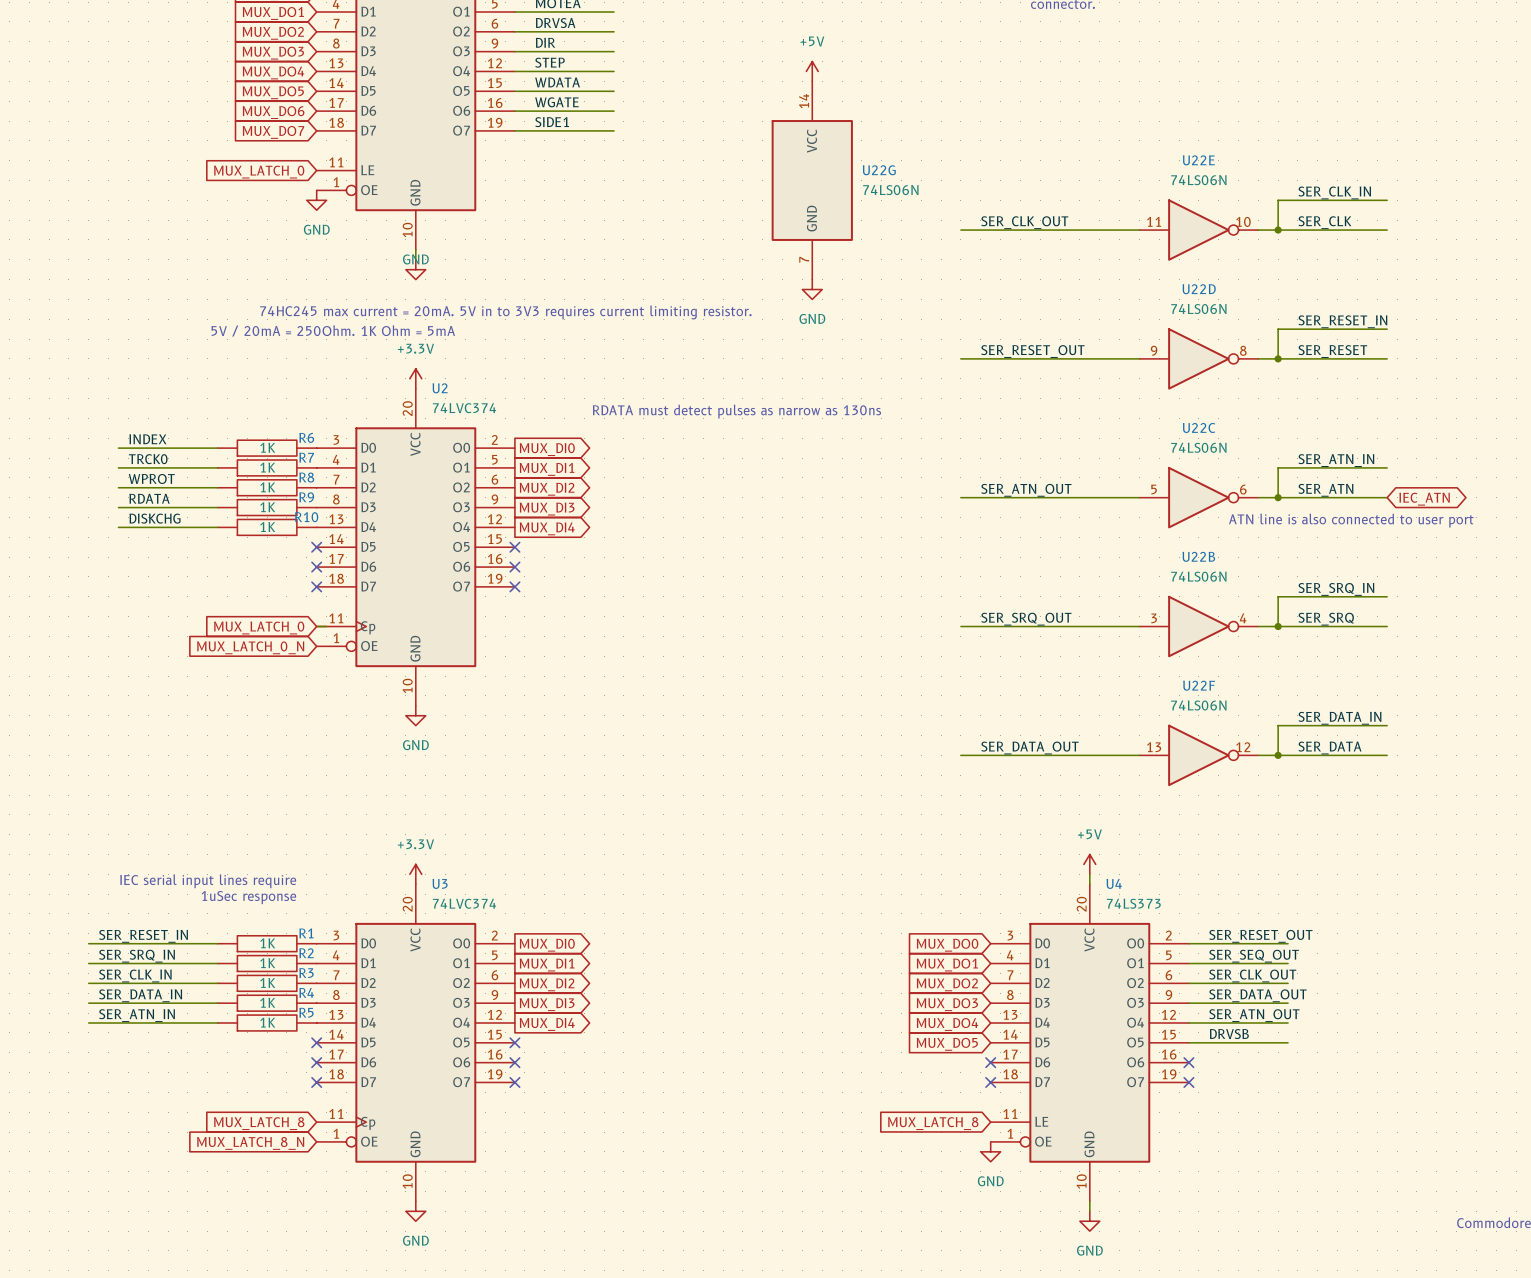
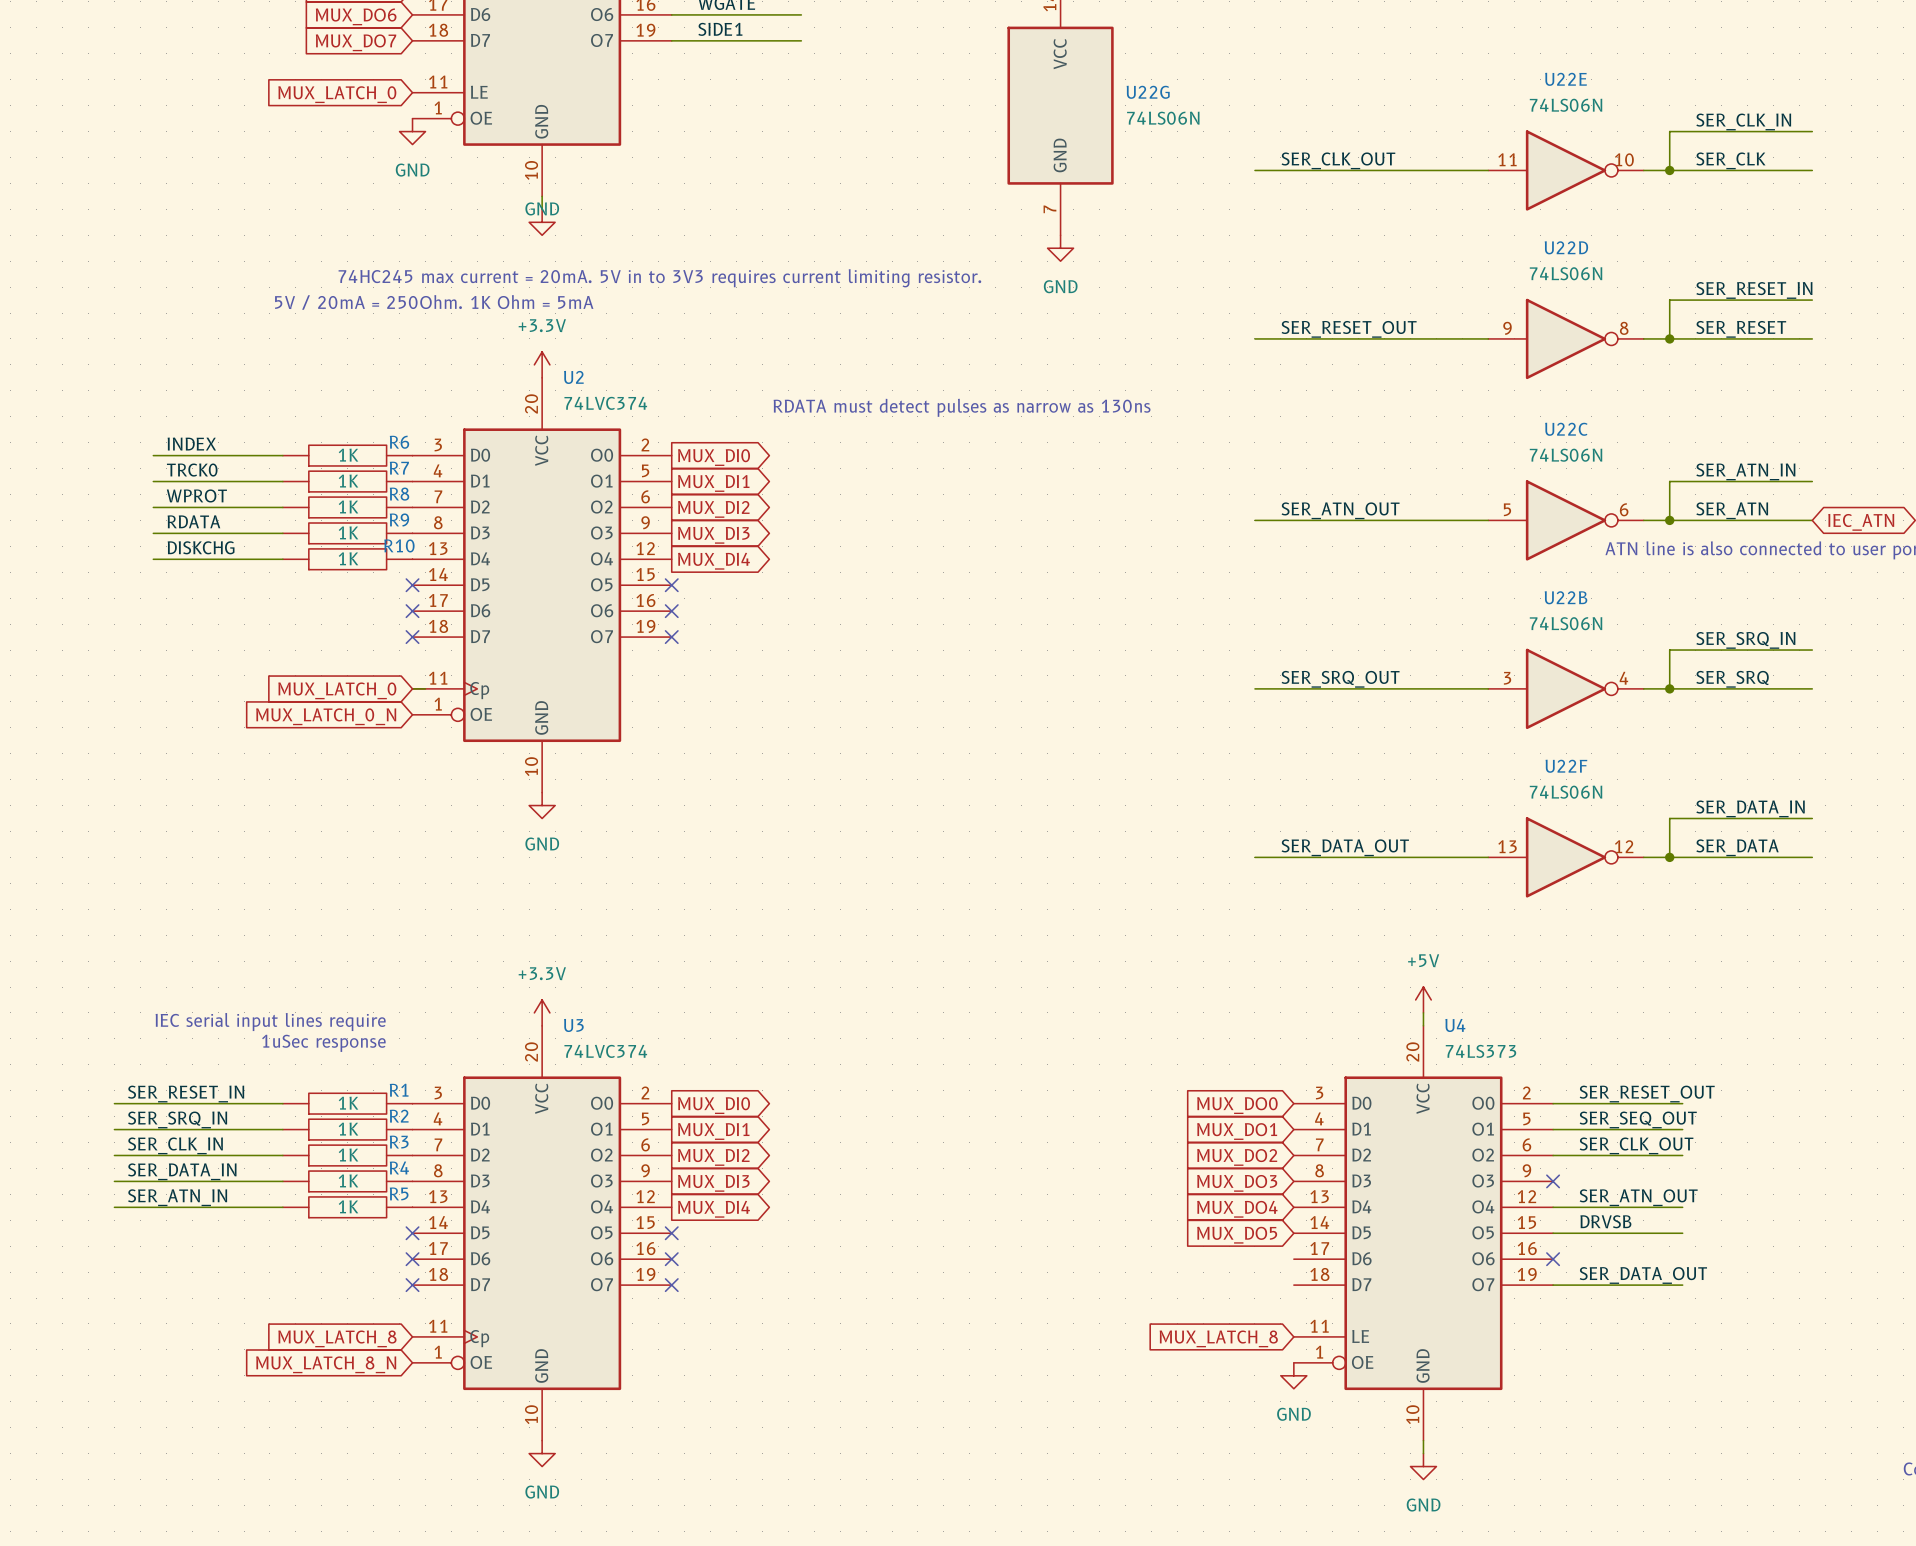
label position: SER_DATA_OUT (1257, 995) -> SER_DATA_OUT (1643, 1275)
wire: (1188, 1003) (1288, 1003) -> (1553, 1285) (1682, 1285)
no-connect mark: none -> (1553, 1181)
no-connect mark: (990, 1062) -> none
no-connect mark: (990, 1082) -> none
no-connect mark: (1188, 1082) -> none

